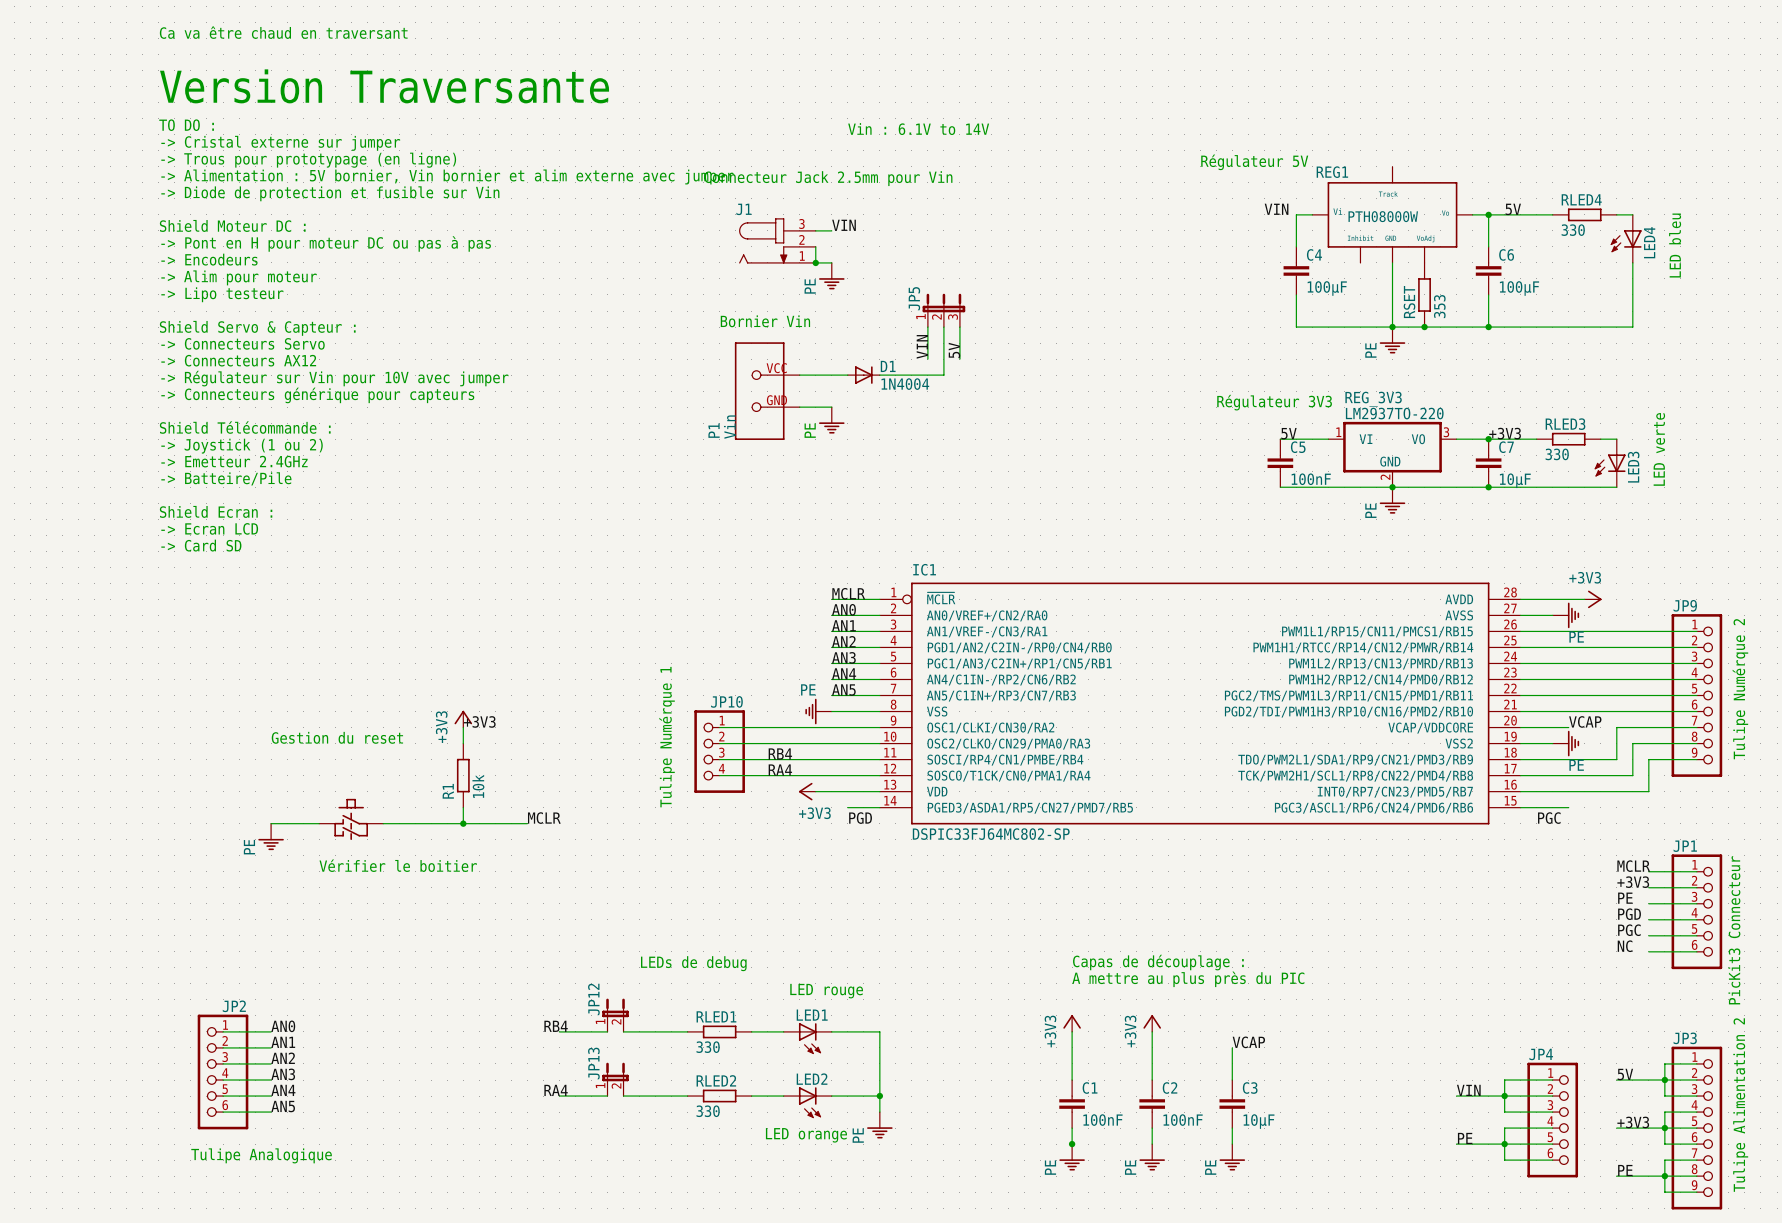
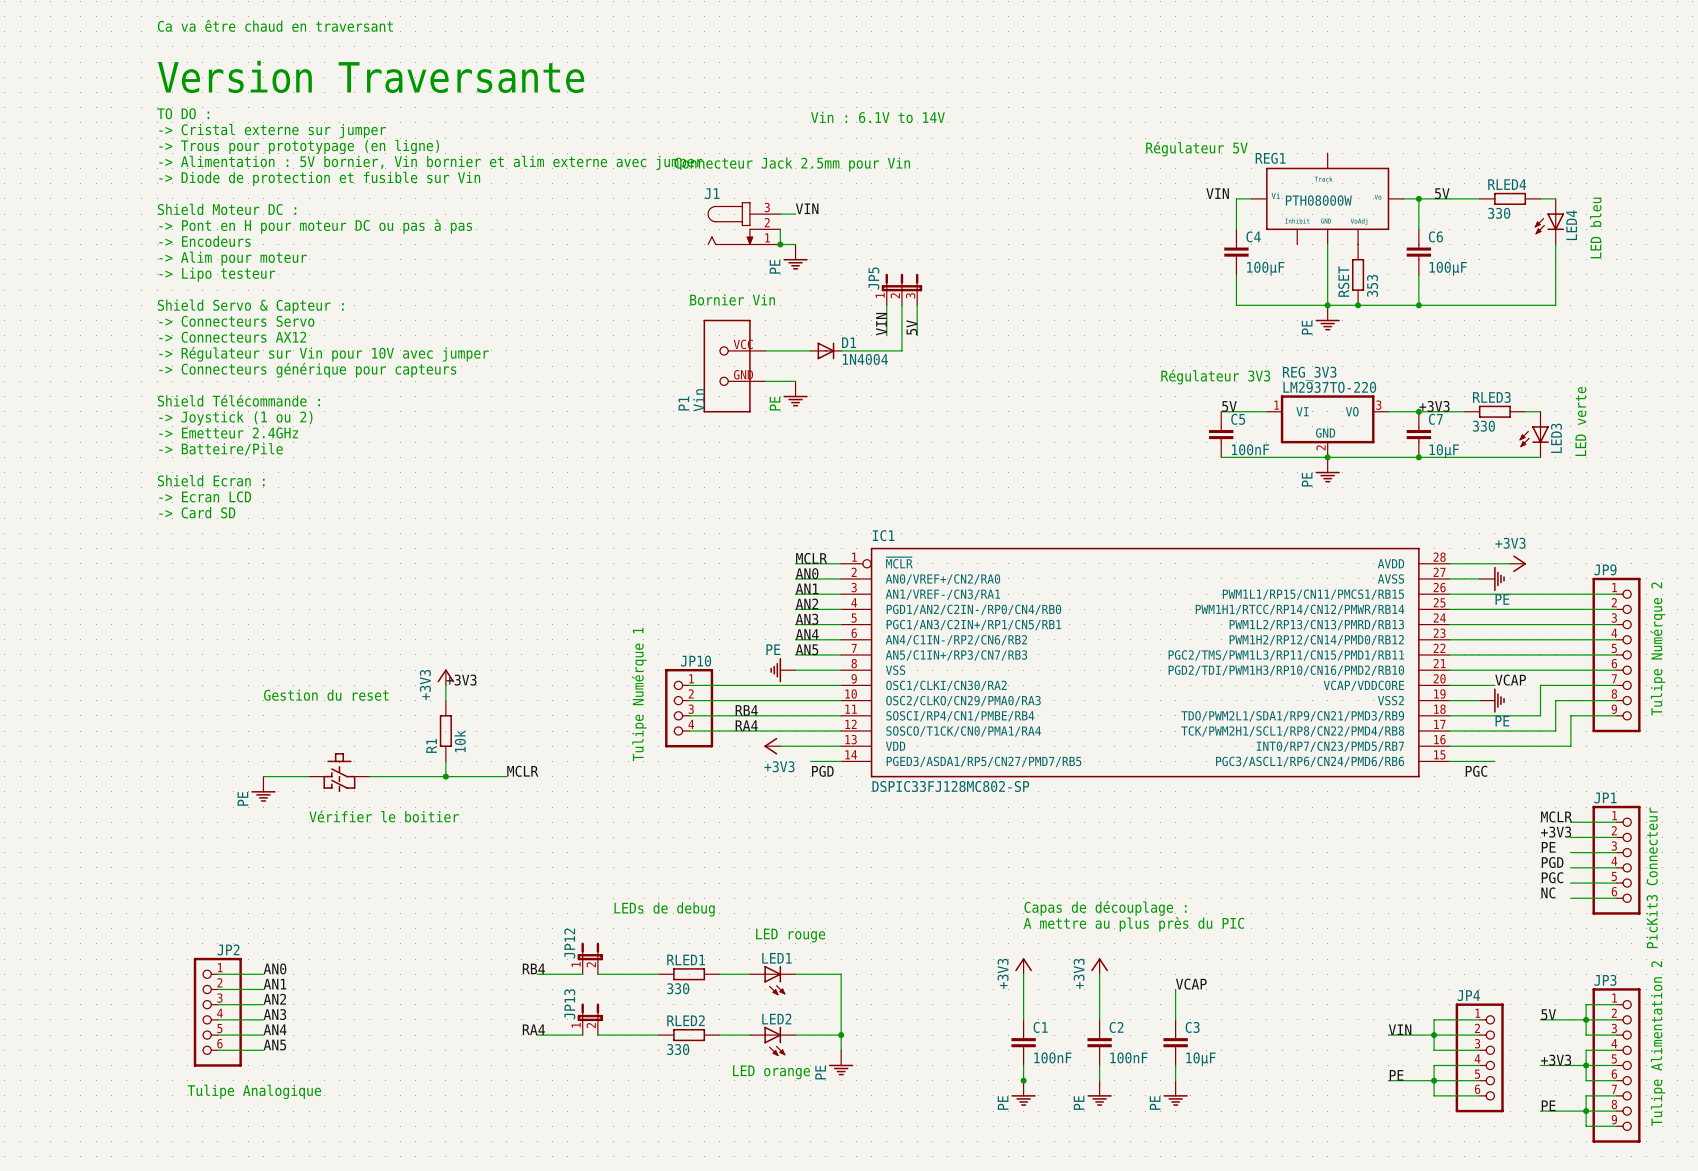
IC1 value: DSPIC33FJ64MC802-SP (991, 834) -> DSPIC33FJ128MC802-SP (950, 786)

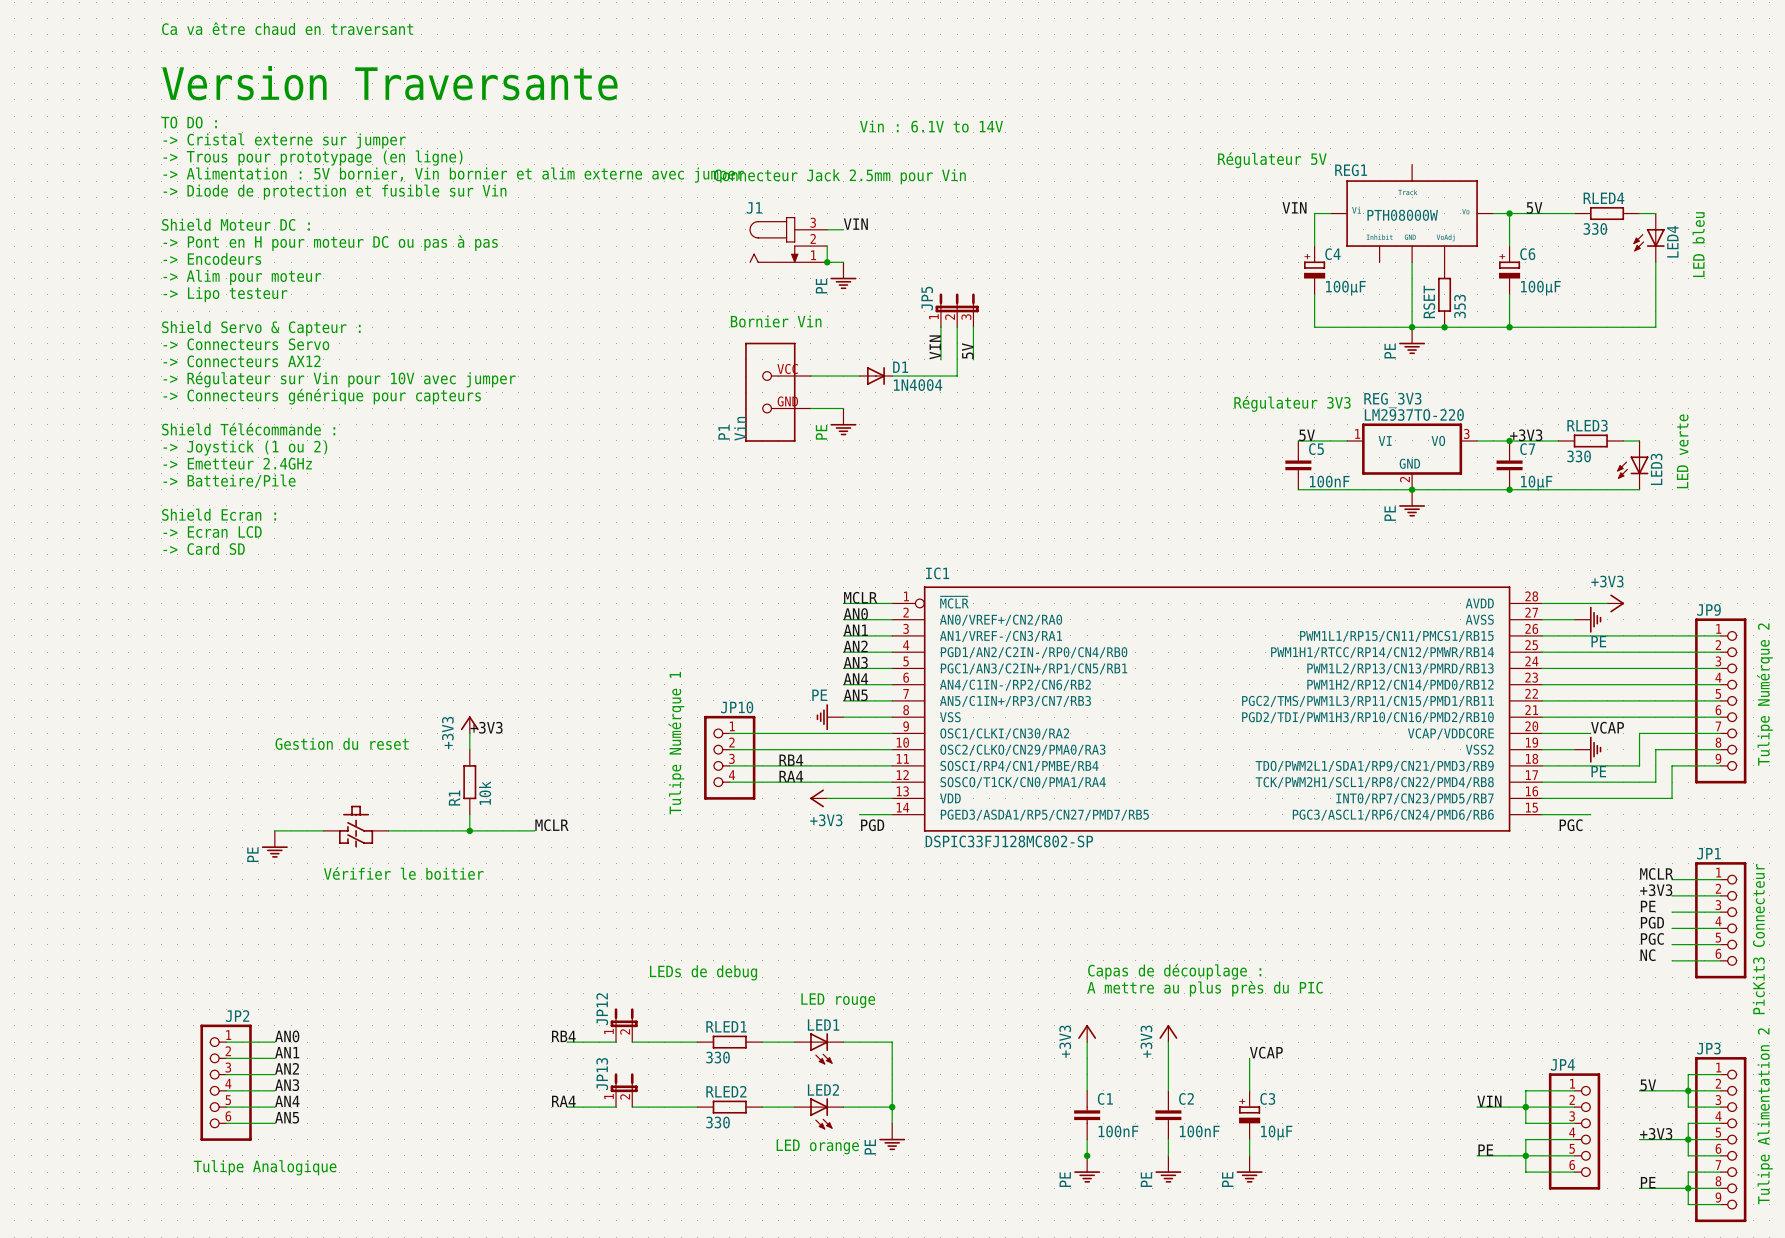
C4 symbol: [1224, 229, 1249, 275] -> [1304, 246, 1326, 295]
C6 symbol: [1406, 229, 1432, 275] -> [1499, 246, 1521, 295]
C3 symbol: [1163, 1019, 1188, 1066] -> [1239, 1090, 1261, 1140]

